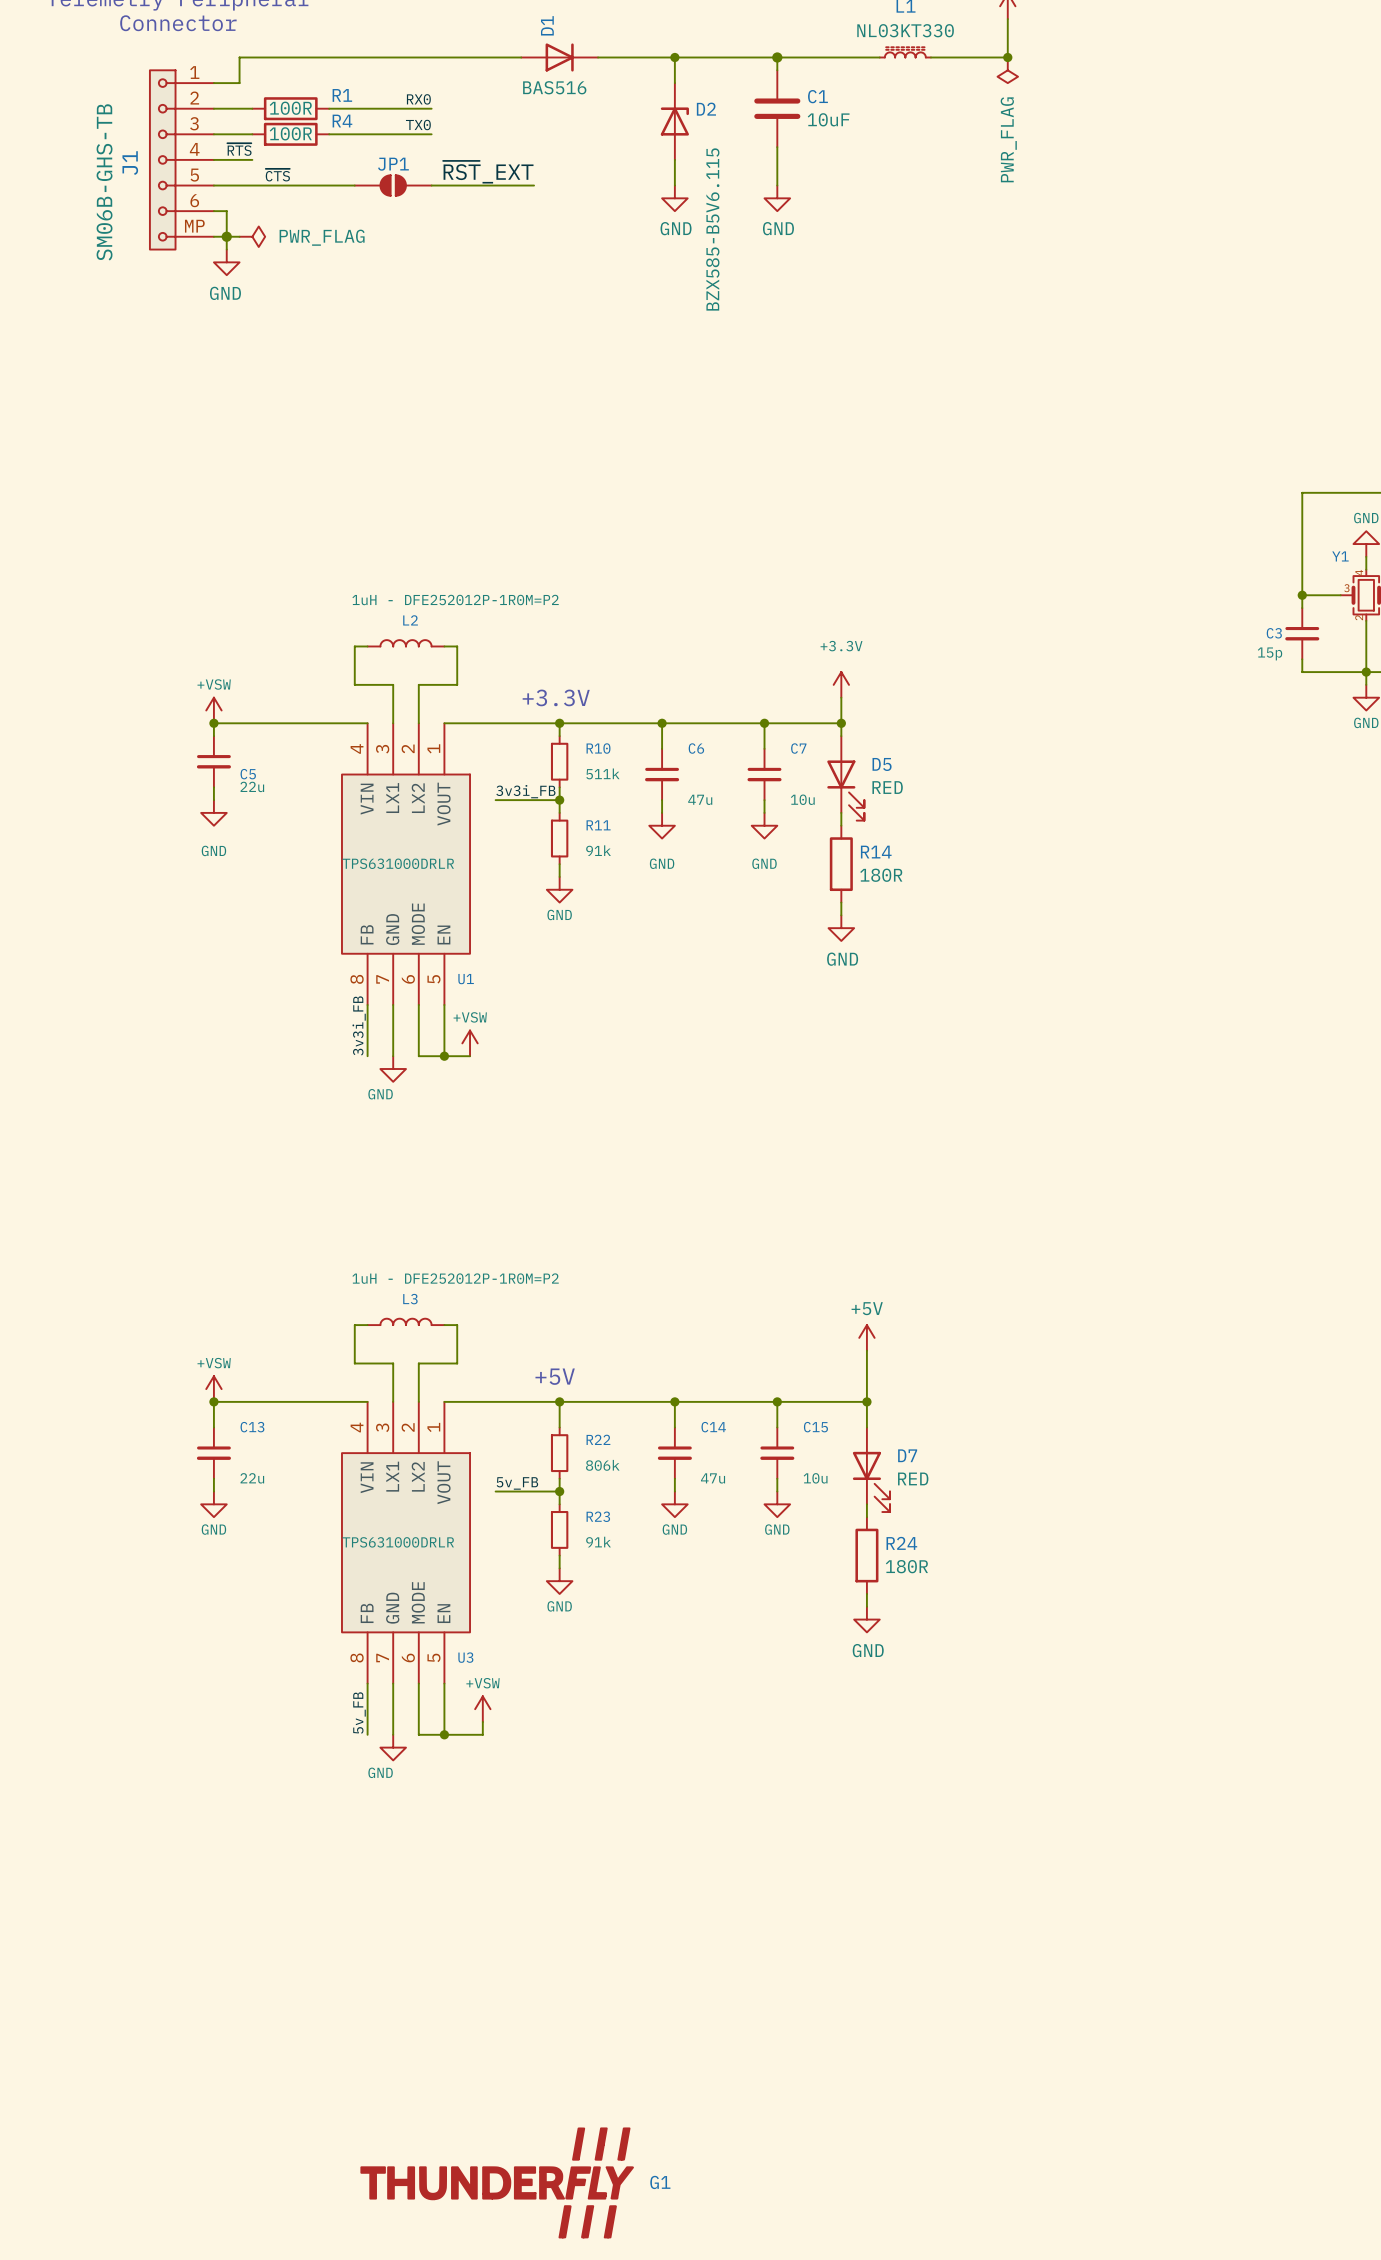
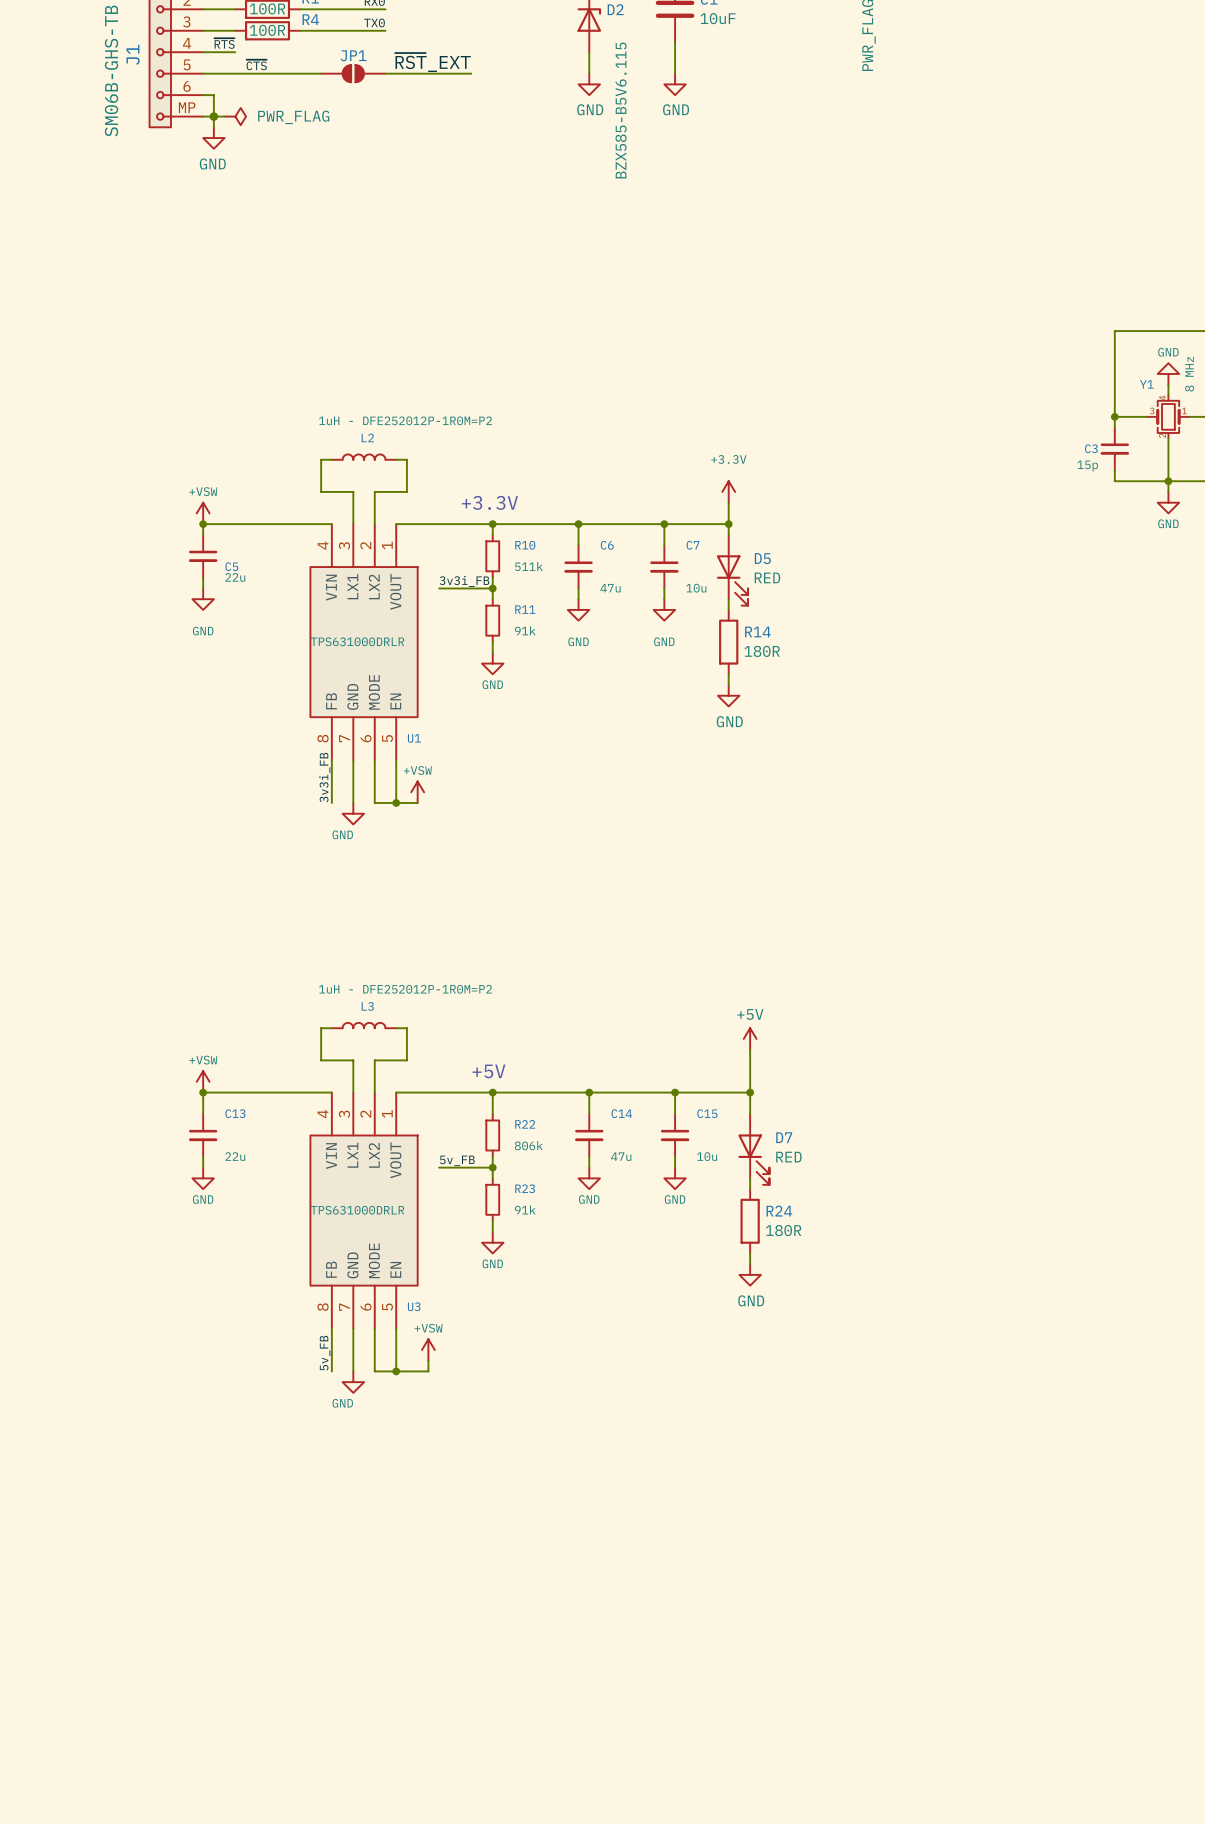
G1: (497, 2182) -> none

